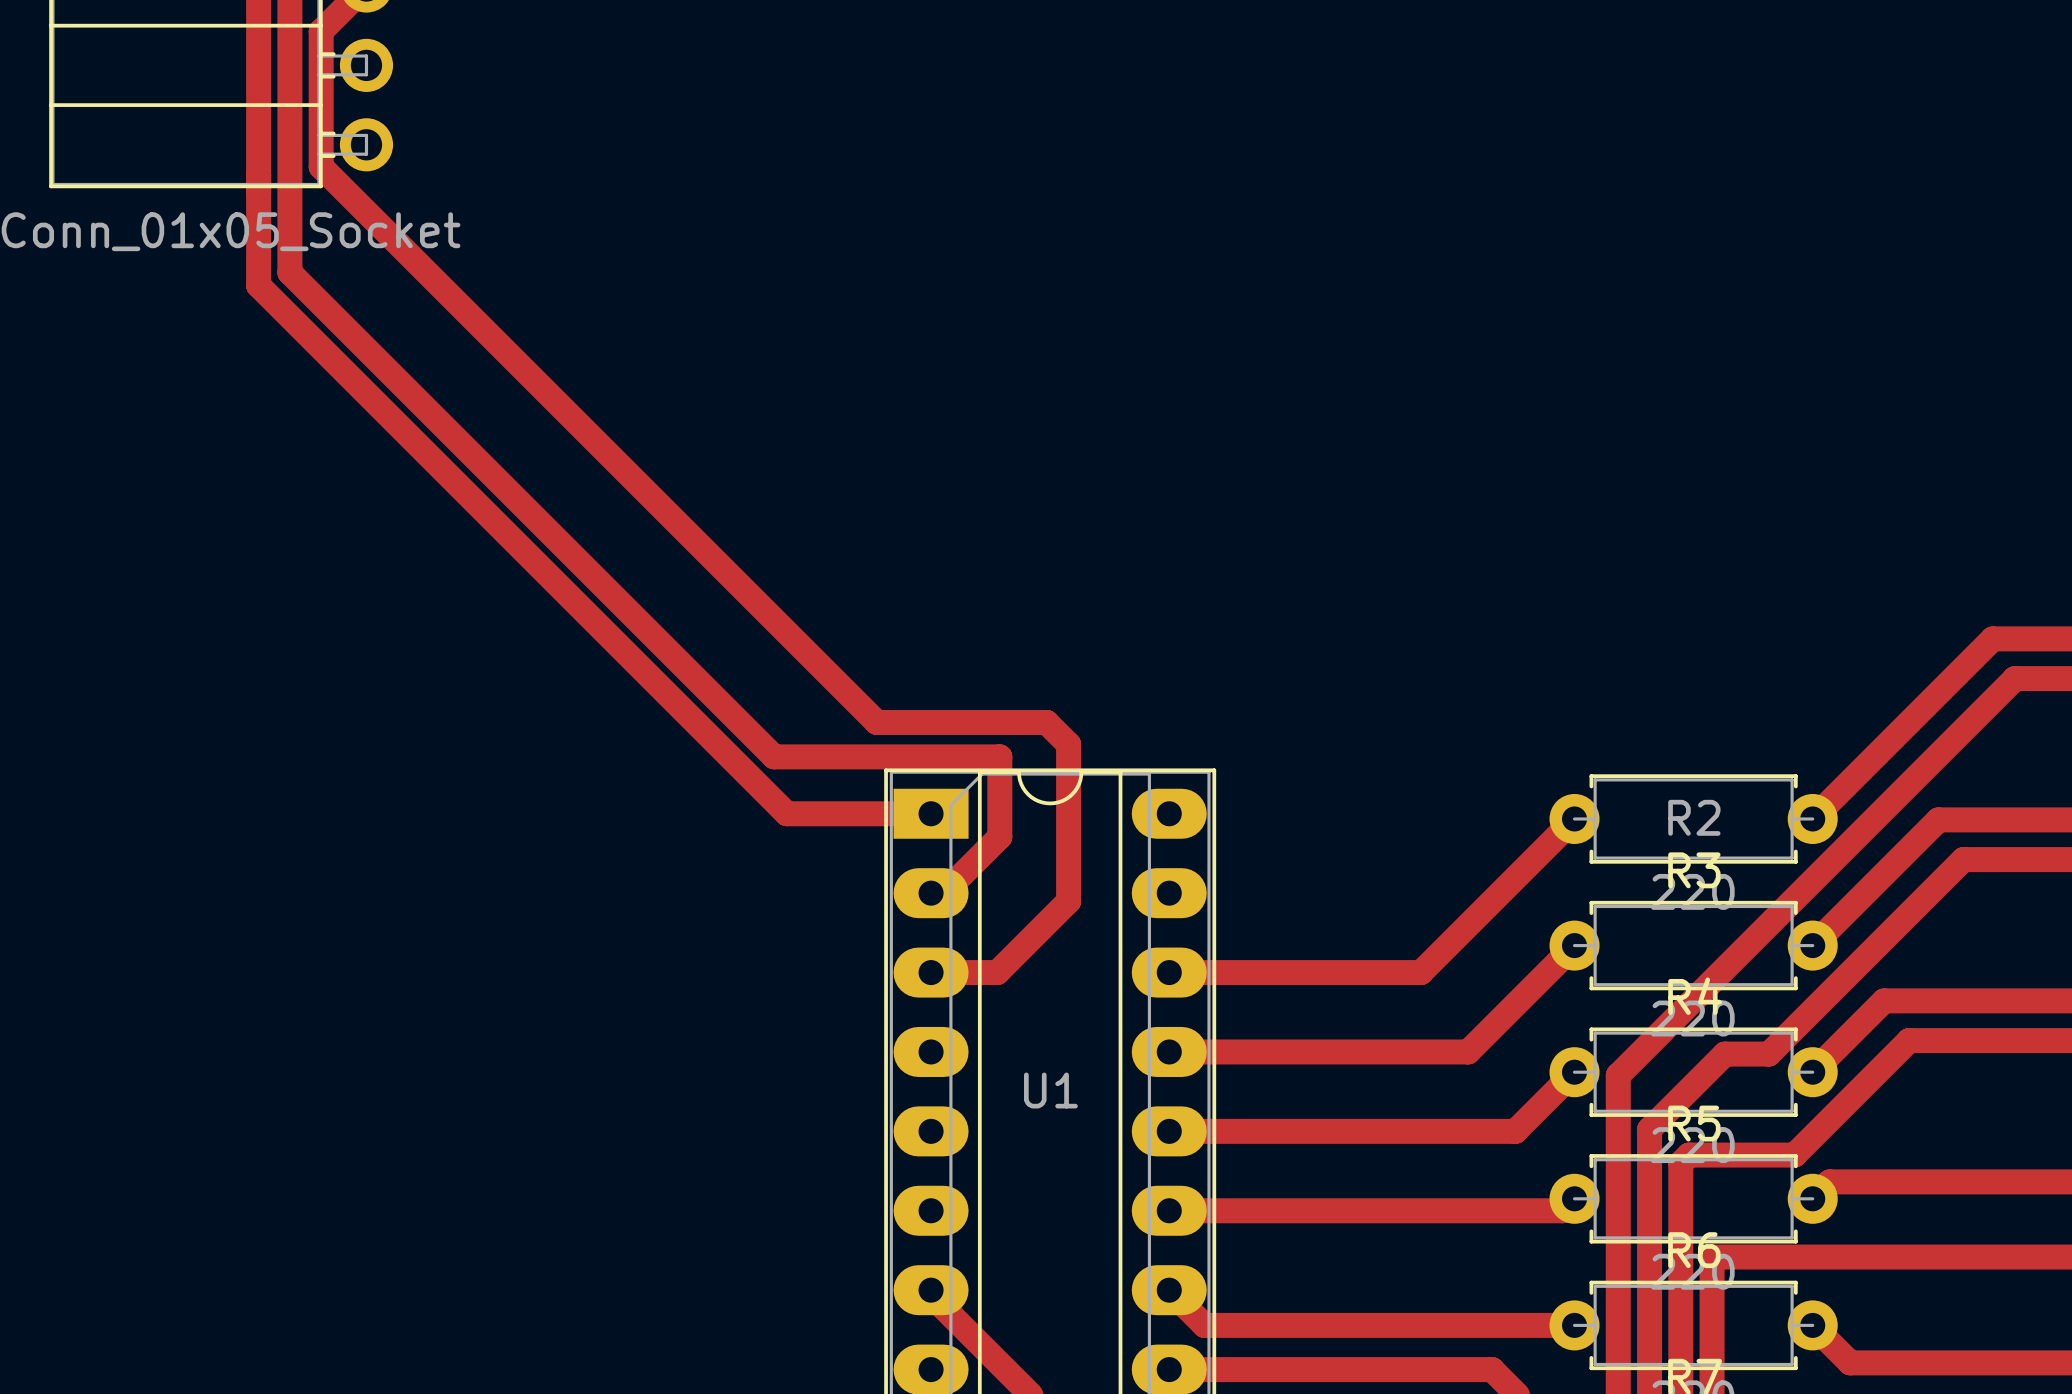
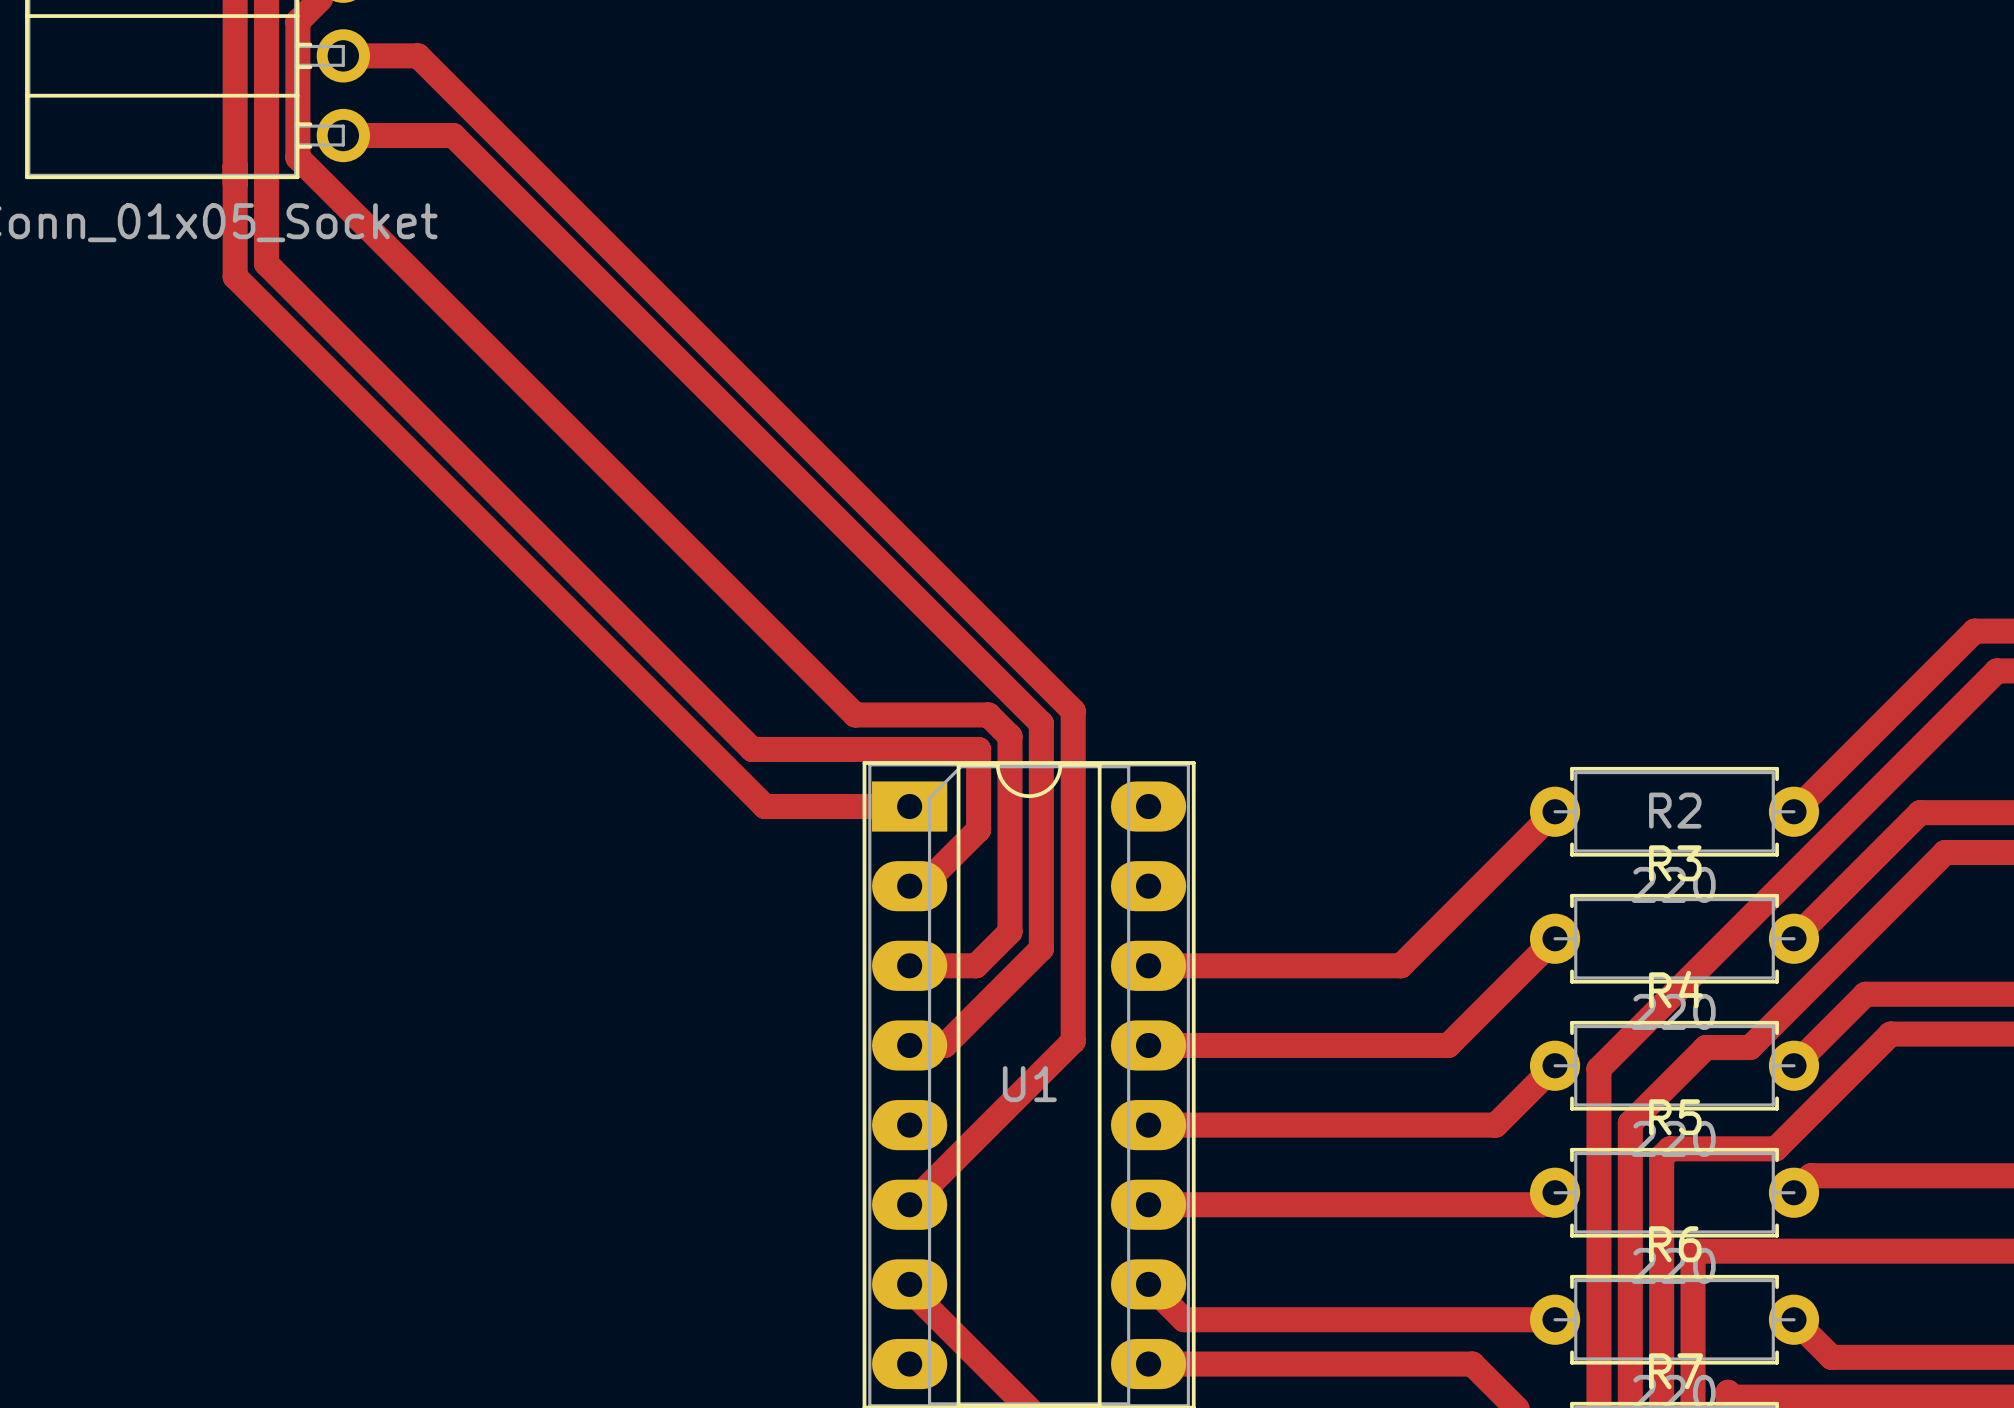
track: none -> (343, 55) (418, 55) (1073, 710) (1073, 1041) (909, 1204)
track: none -> (343, 135) (453, 135) (1041, 723) (1041, 948) (944, 1045) (909, 1045)
track: (1009, 722) (1046, 722) (1068, 744) (1068, 901) (1031, 938) -> (988, 714) (1009, 736) (1009, 931)

